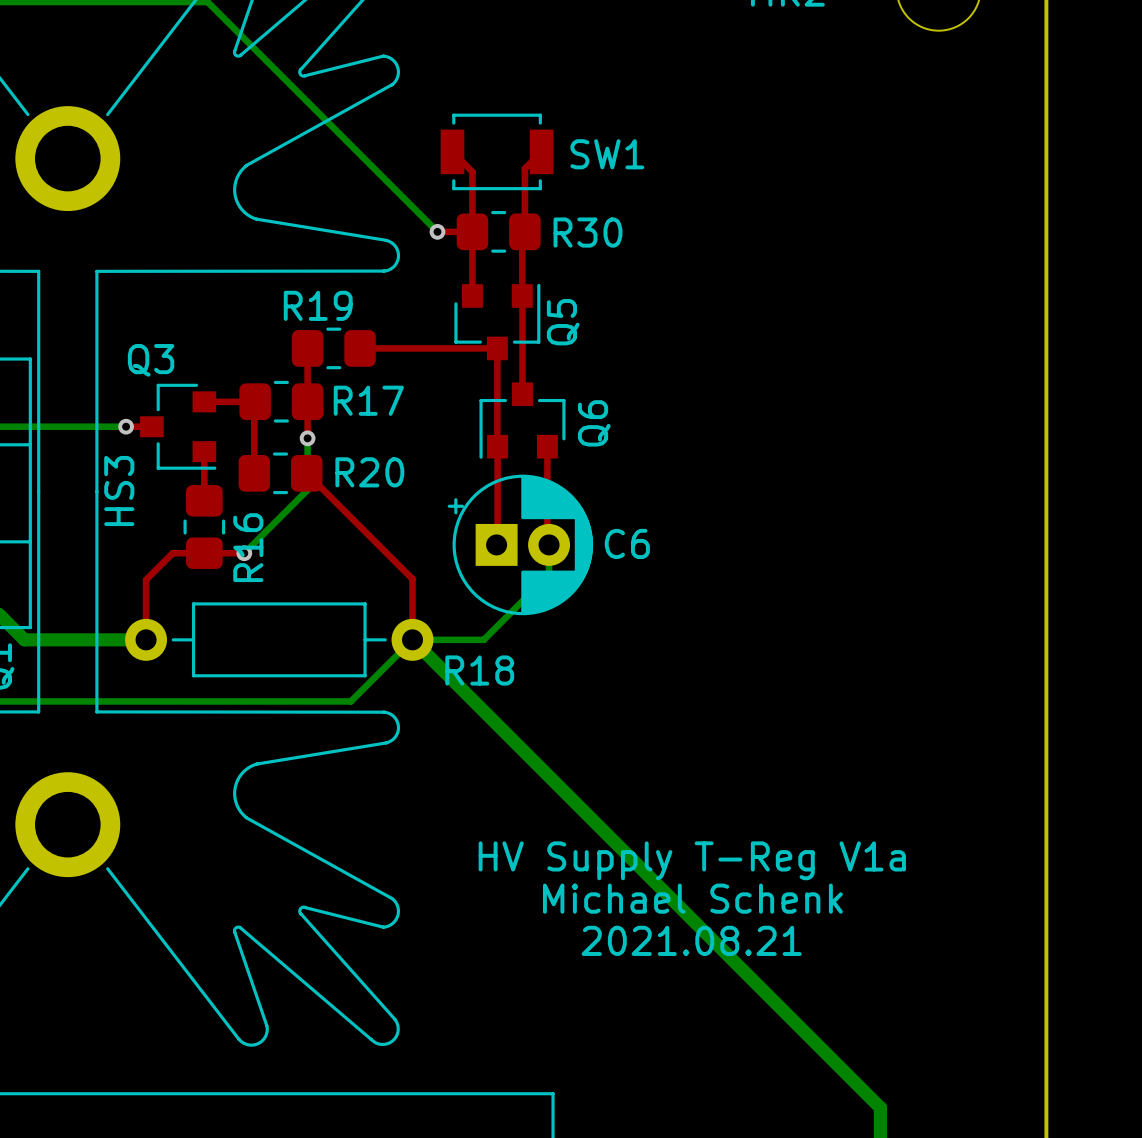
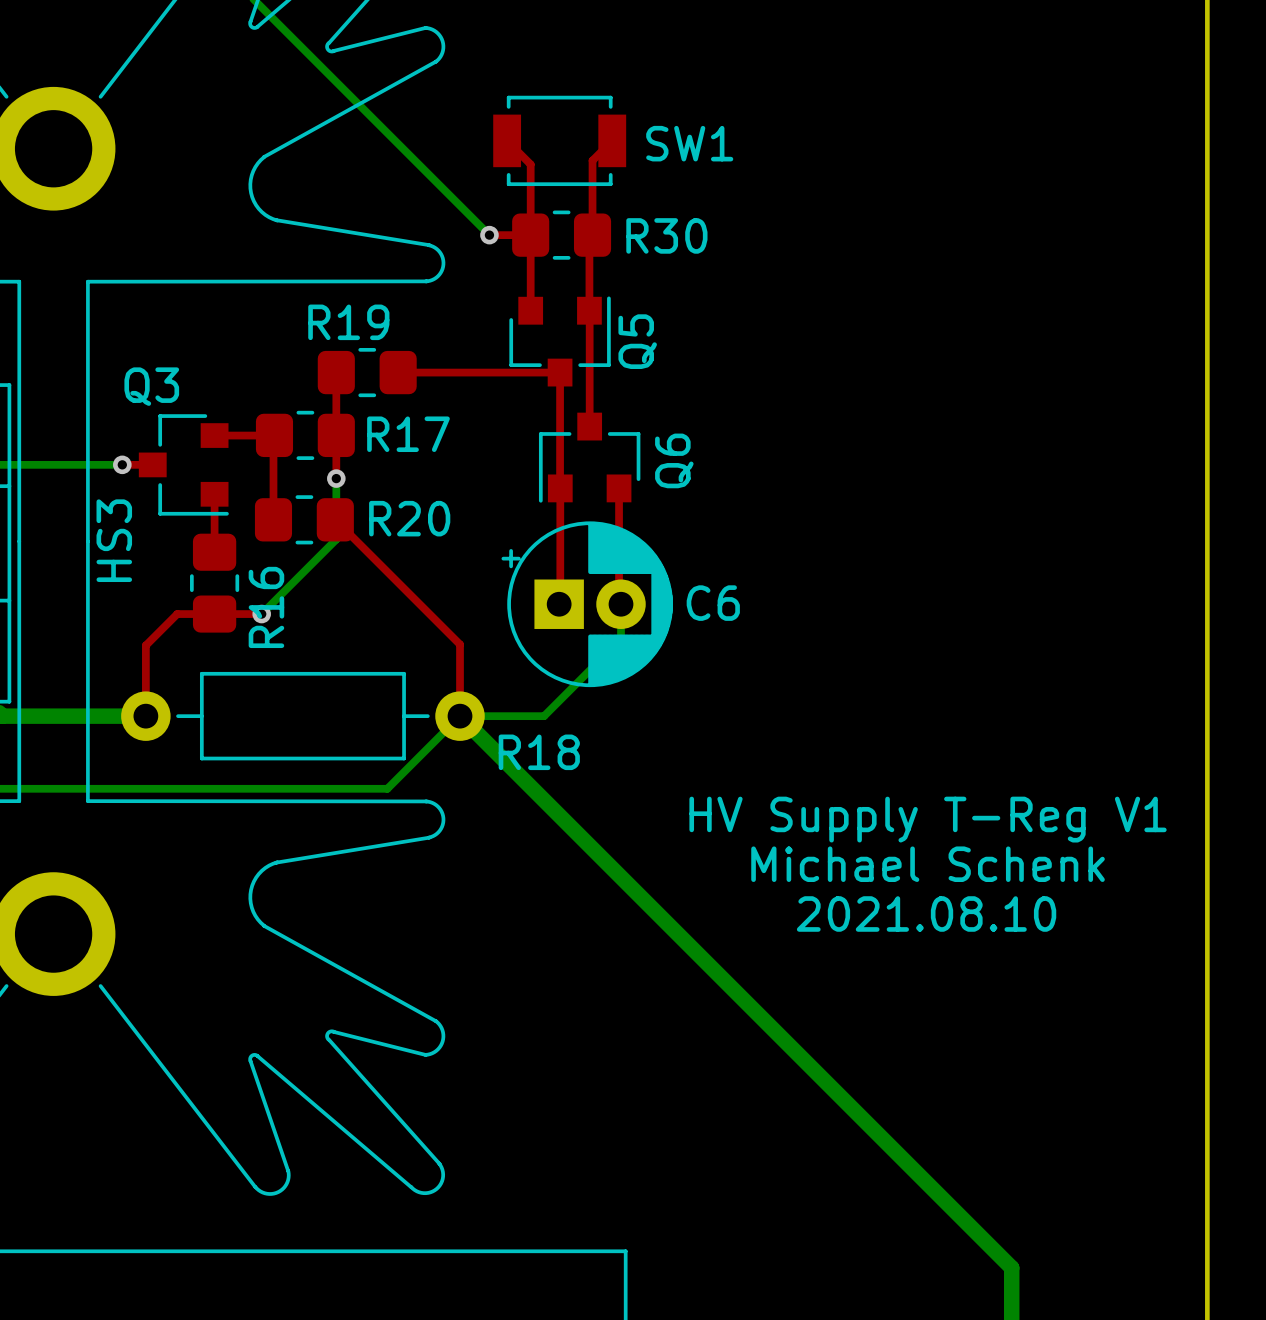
text: none -> HV Supply T-Reg V1 (928, 819)
text: none -> 2021.08.10 (926, 913)
text: HV Supply T-Reg V1a (692, 860) -> none
text position: Michael Schenk (692, 898) -> Michael Schenk (928, 864)
text: 2021.08.21 (691, 940) -> none

